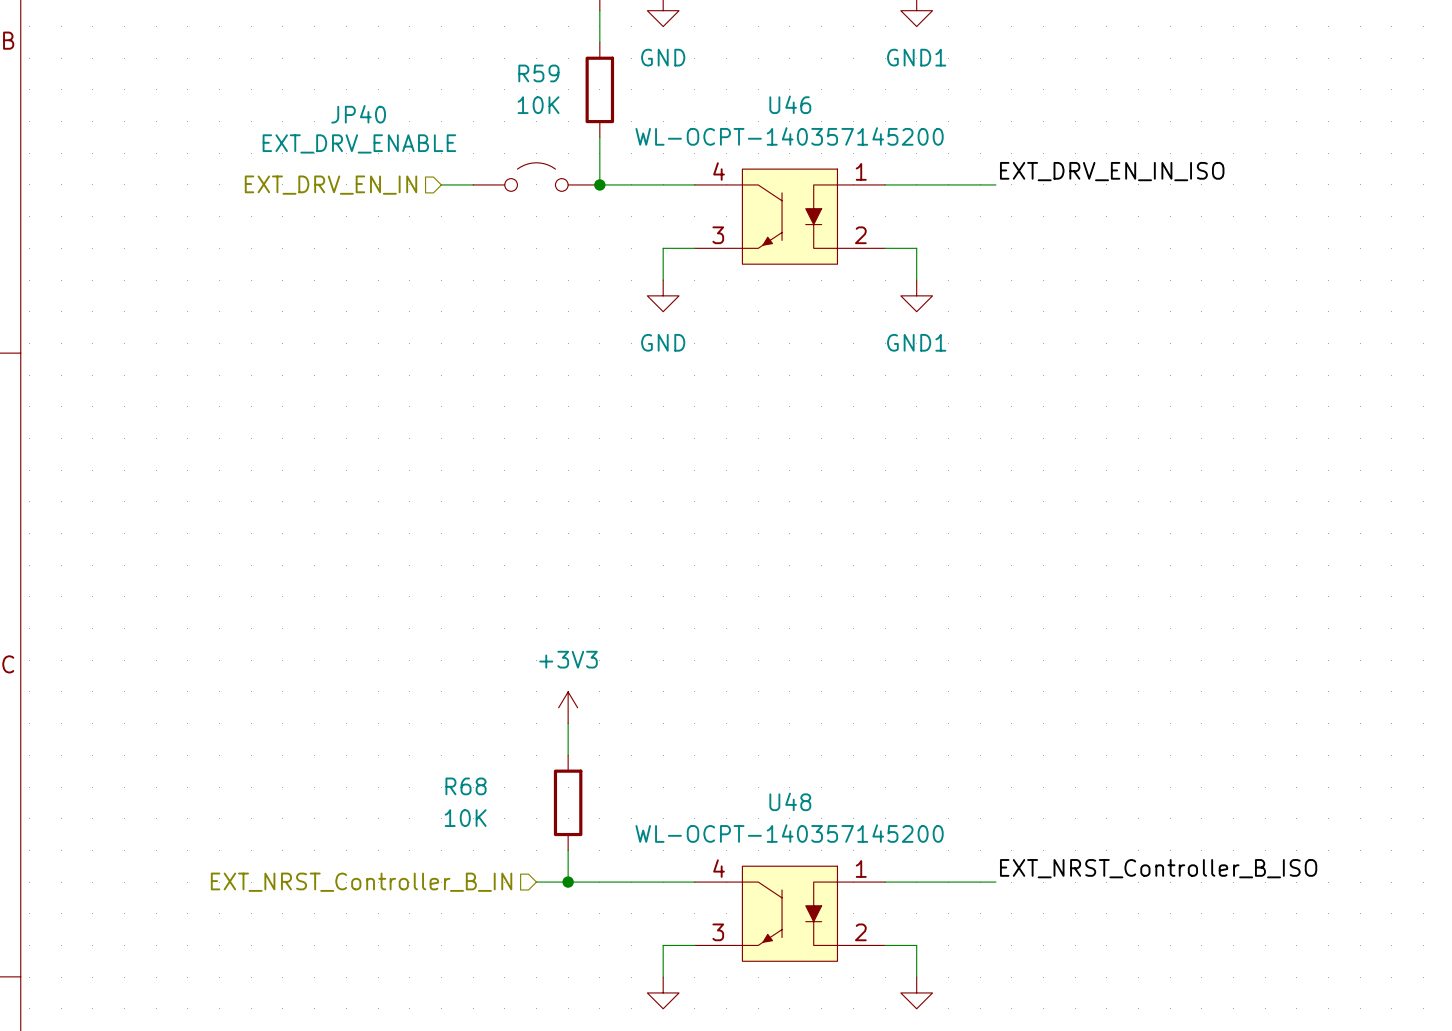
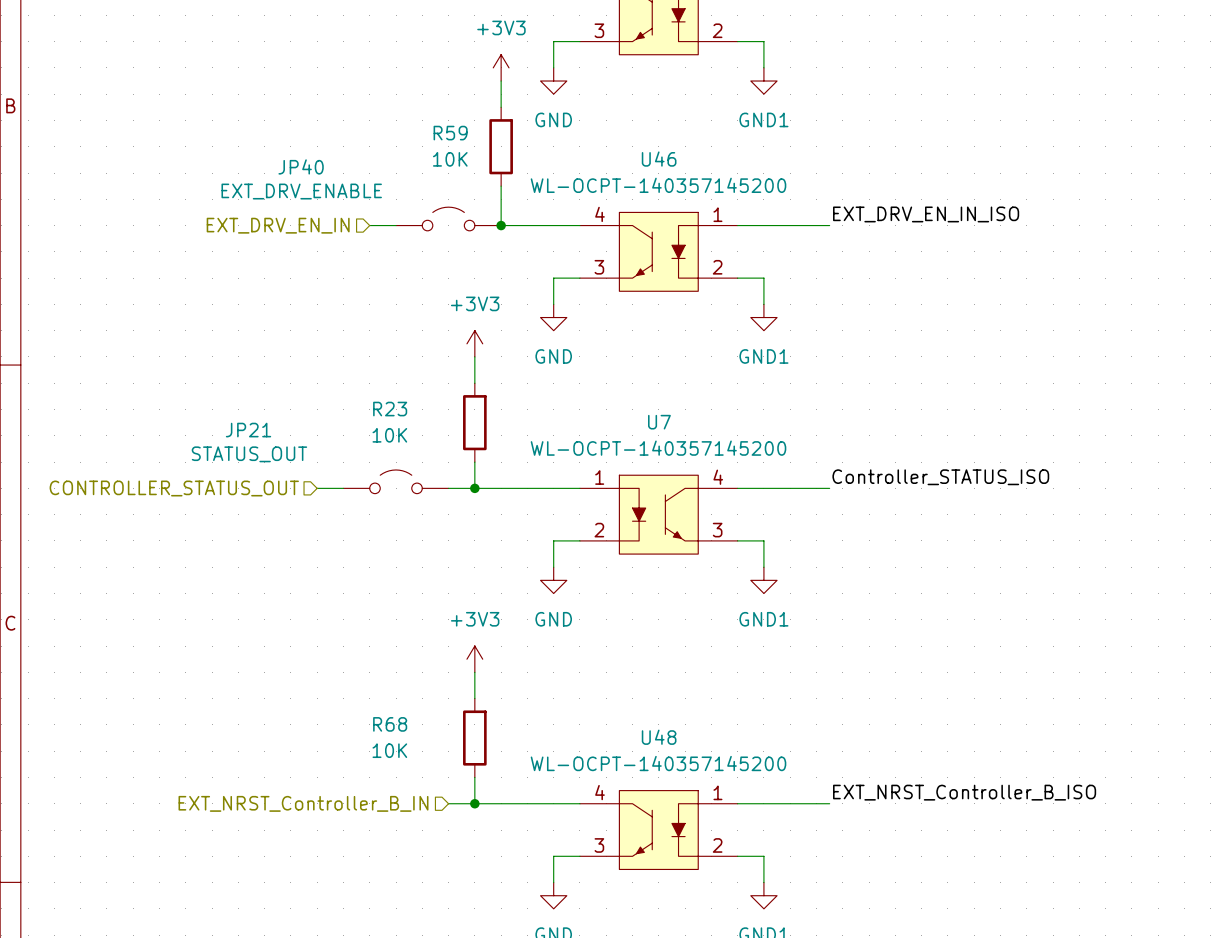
power symbol: none -> +3V3 (474, 343)
wire: none -> (474, 356) (474, 383)
R23: none -> 10K (474, 422)
wire: none -> (474, 462) (474, 488)
label: none -> Controller_STATUS_ISO (940, 477)
JP21: none -> STATUS_OUT (396, 481)
hierarchical label: none -> CONTROLLER_STATUS_OUT (174, 488)
wire: none -> (317, 488) (343, 488)
wire: none -> (448, 488) (579, 488)
junction: none -> (474, 488)
wire: none -> (737, 488) (829, 488)
U7: none -> WL-OCPT-140357145200 (658, 514)
wire: none -> (579, 540) (553, 540) (553, 567)
wire: none -> (737, 540) (763, 540) (763, 567)
power symbol: none -> GND (553, 580)
power symbol: none -> GND1 (763, 580)

